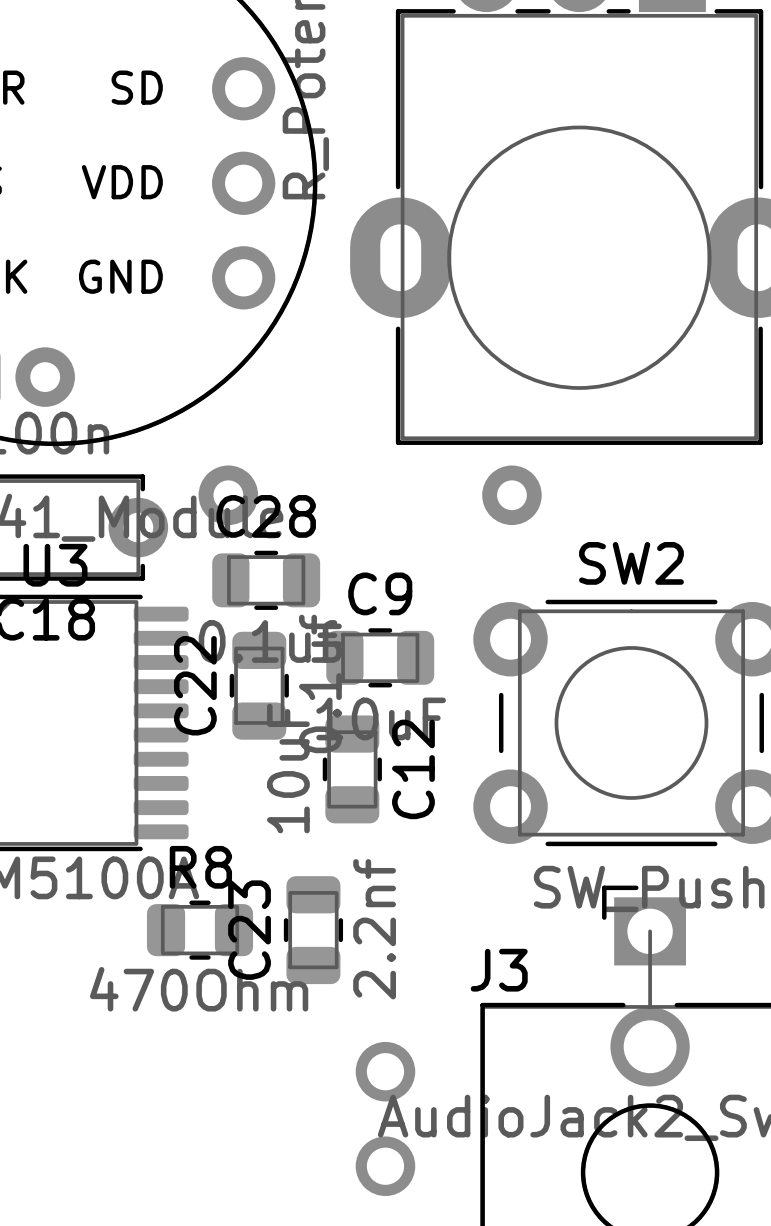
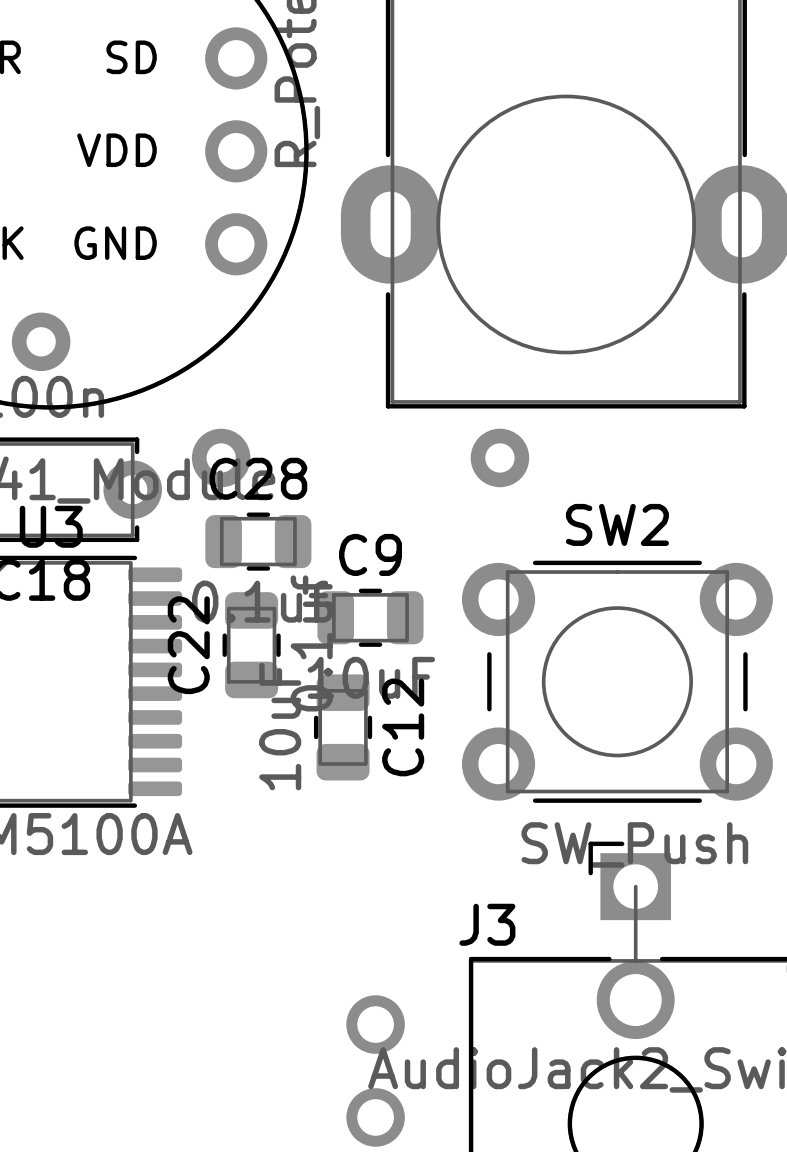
R8: 470Ohm (200, 930) -> none
C23: 2.2nf (313, 930) -> none

